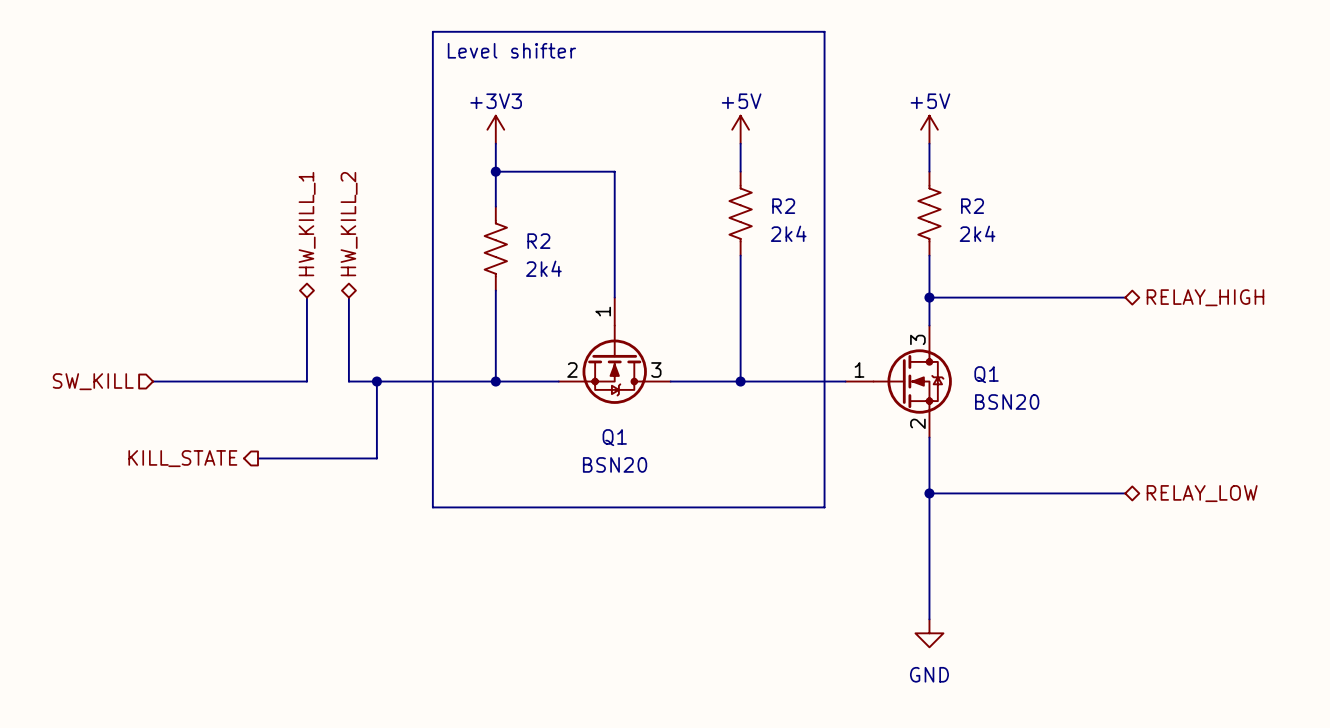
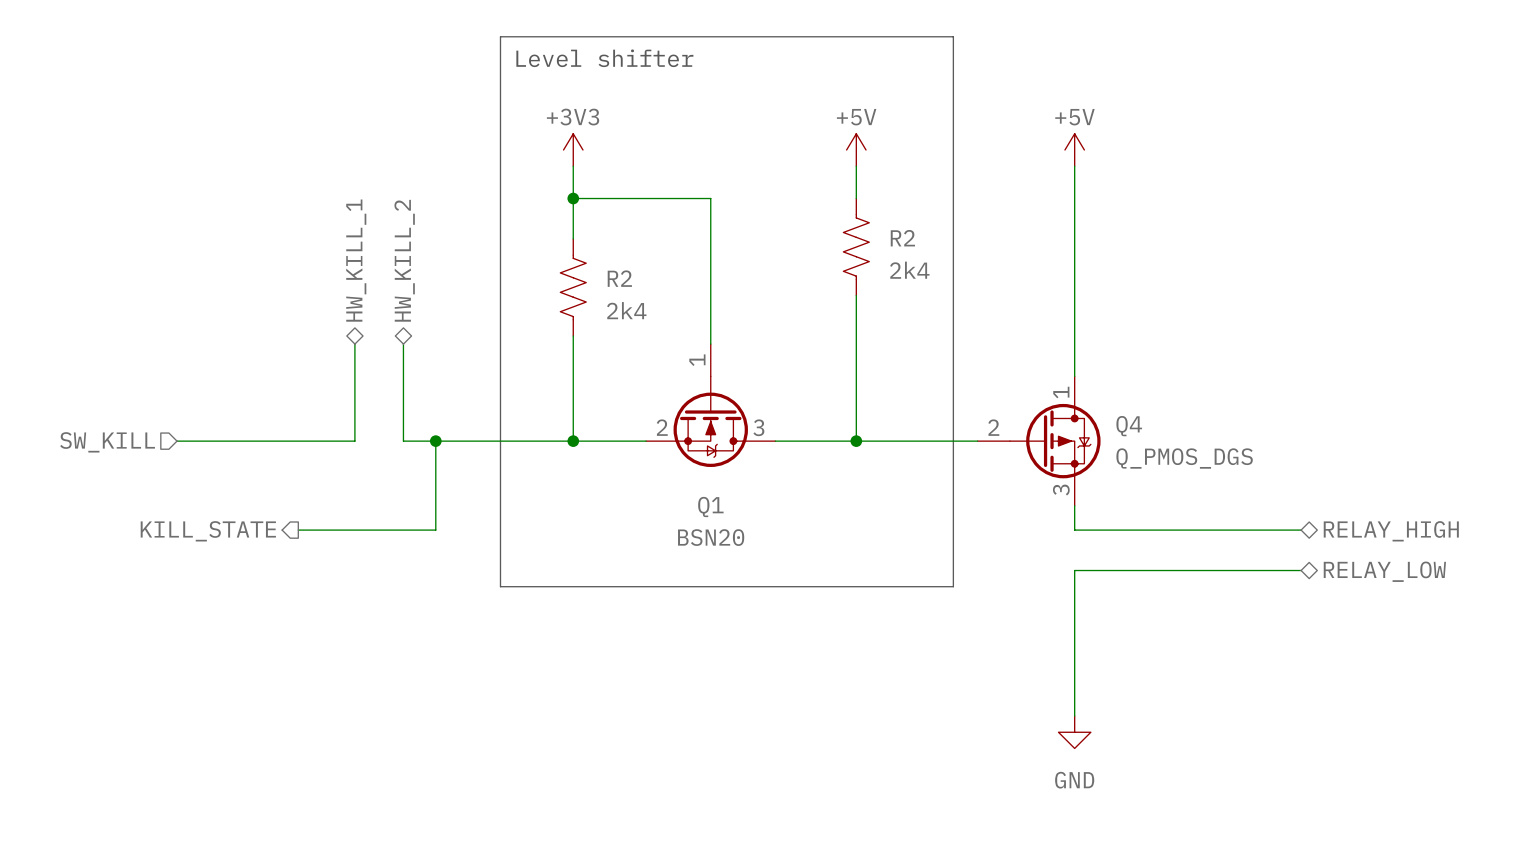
wire: none -> (1074, 198) (1074, 295)
R2: 2k4 (929, 213) -> none
wire: (929, 297) (1125, 297) -> none
junction: (929, 297) -> none
hierarchical label position: RELAY_HIGH (1205, 297) -> RELAY_HIGH (1391, 531)
Q1: BSN20 (898, 381) -> none
Q4: none -> Q_PMOS_DGS (1039, 441)
wire: (929, 458) (929, 493) -> (1074, 530) (1301, 530)
junction: (929, 493) -> none

